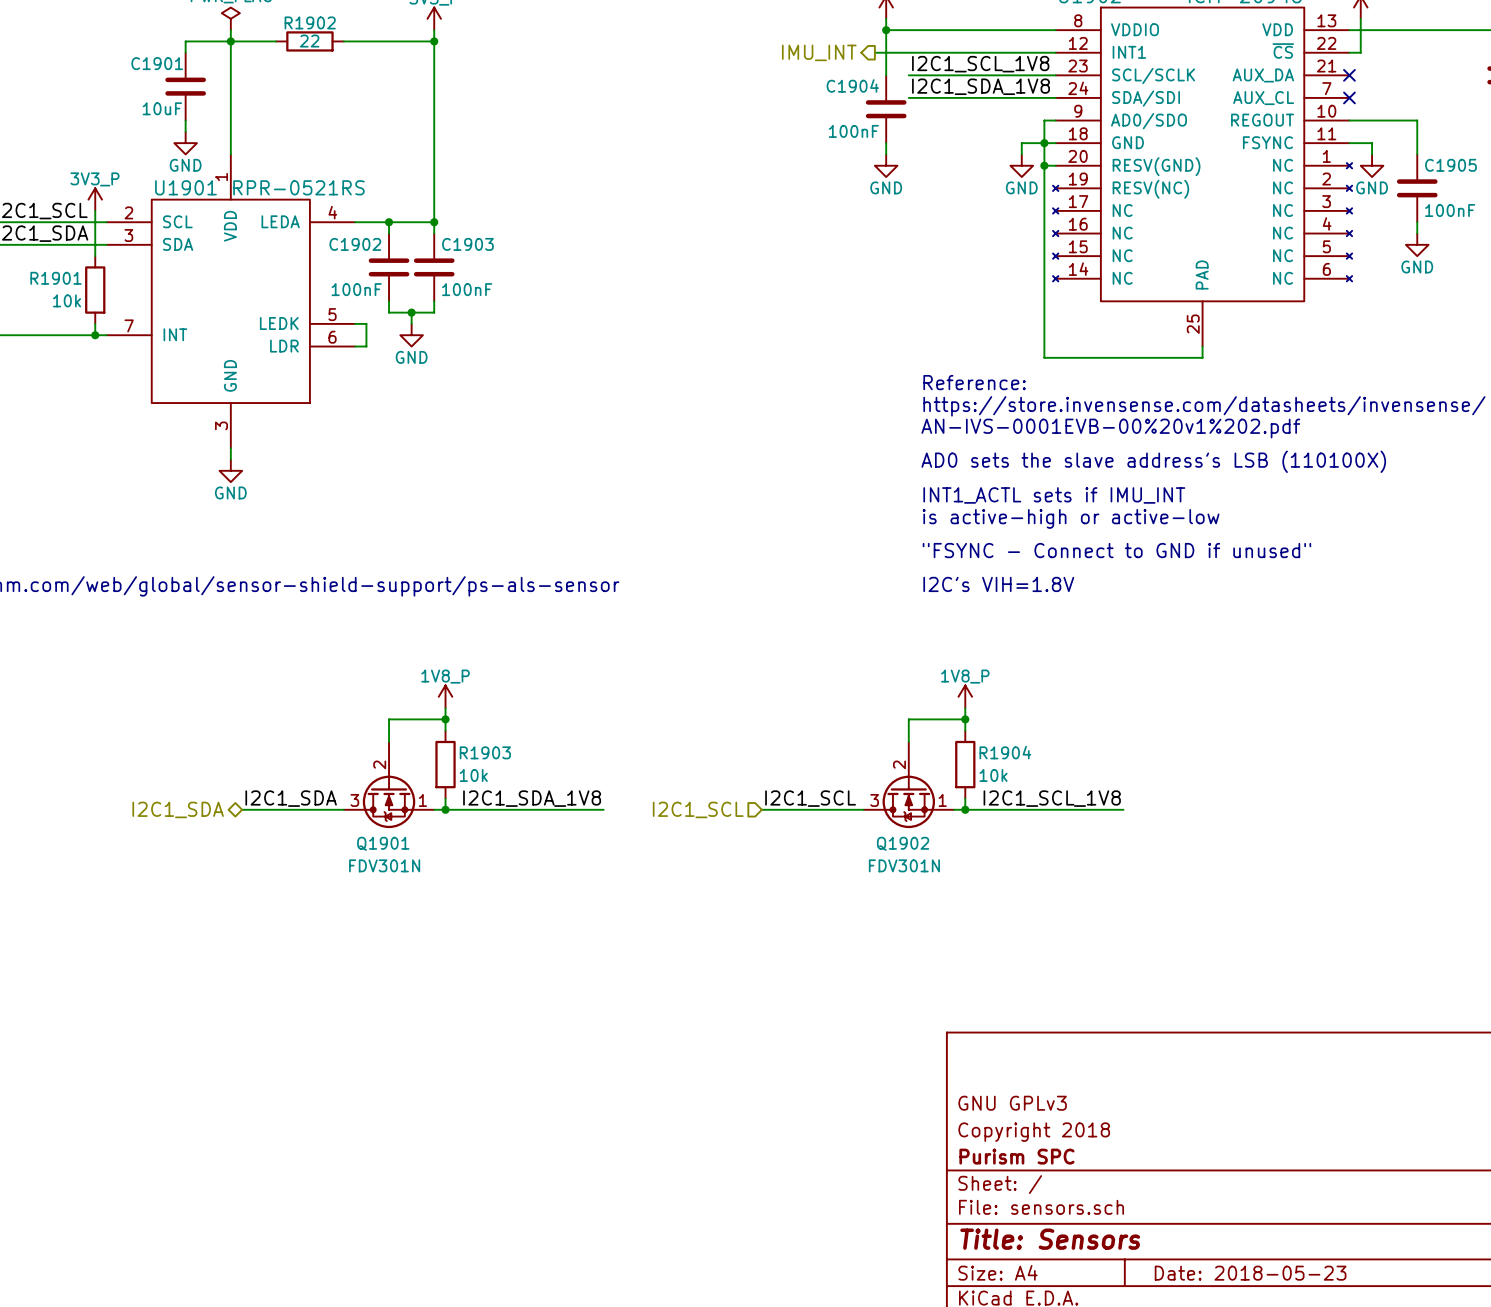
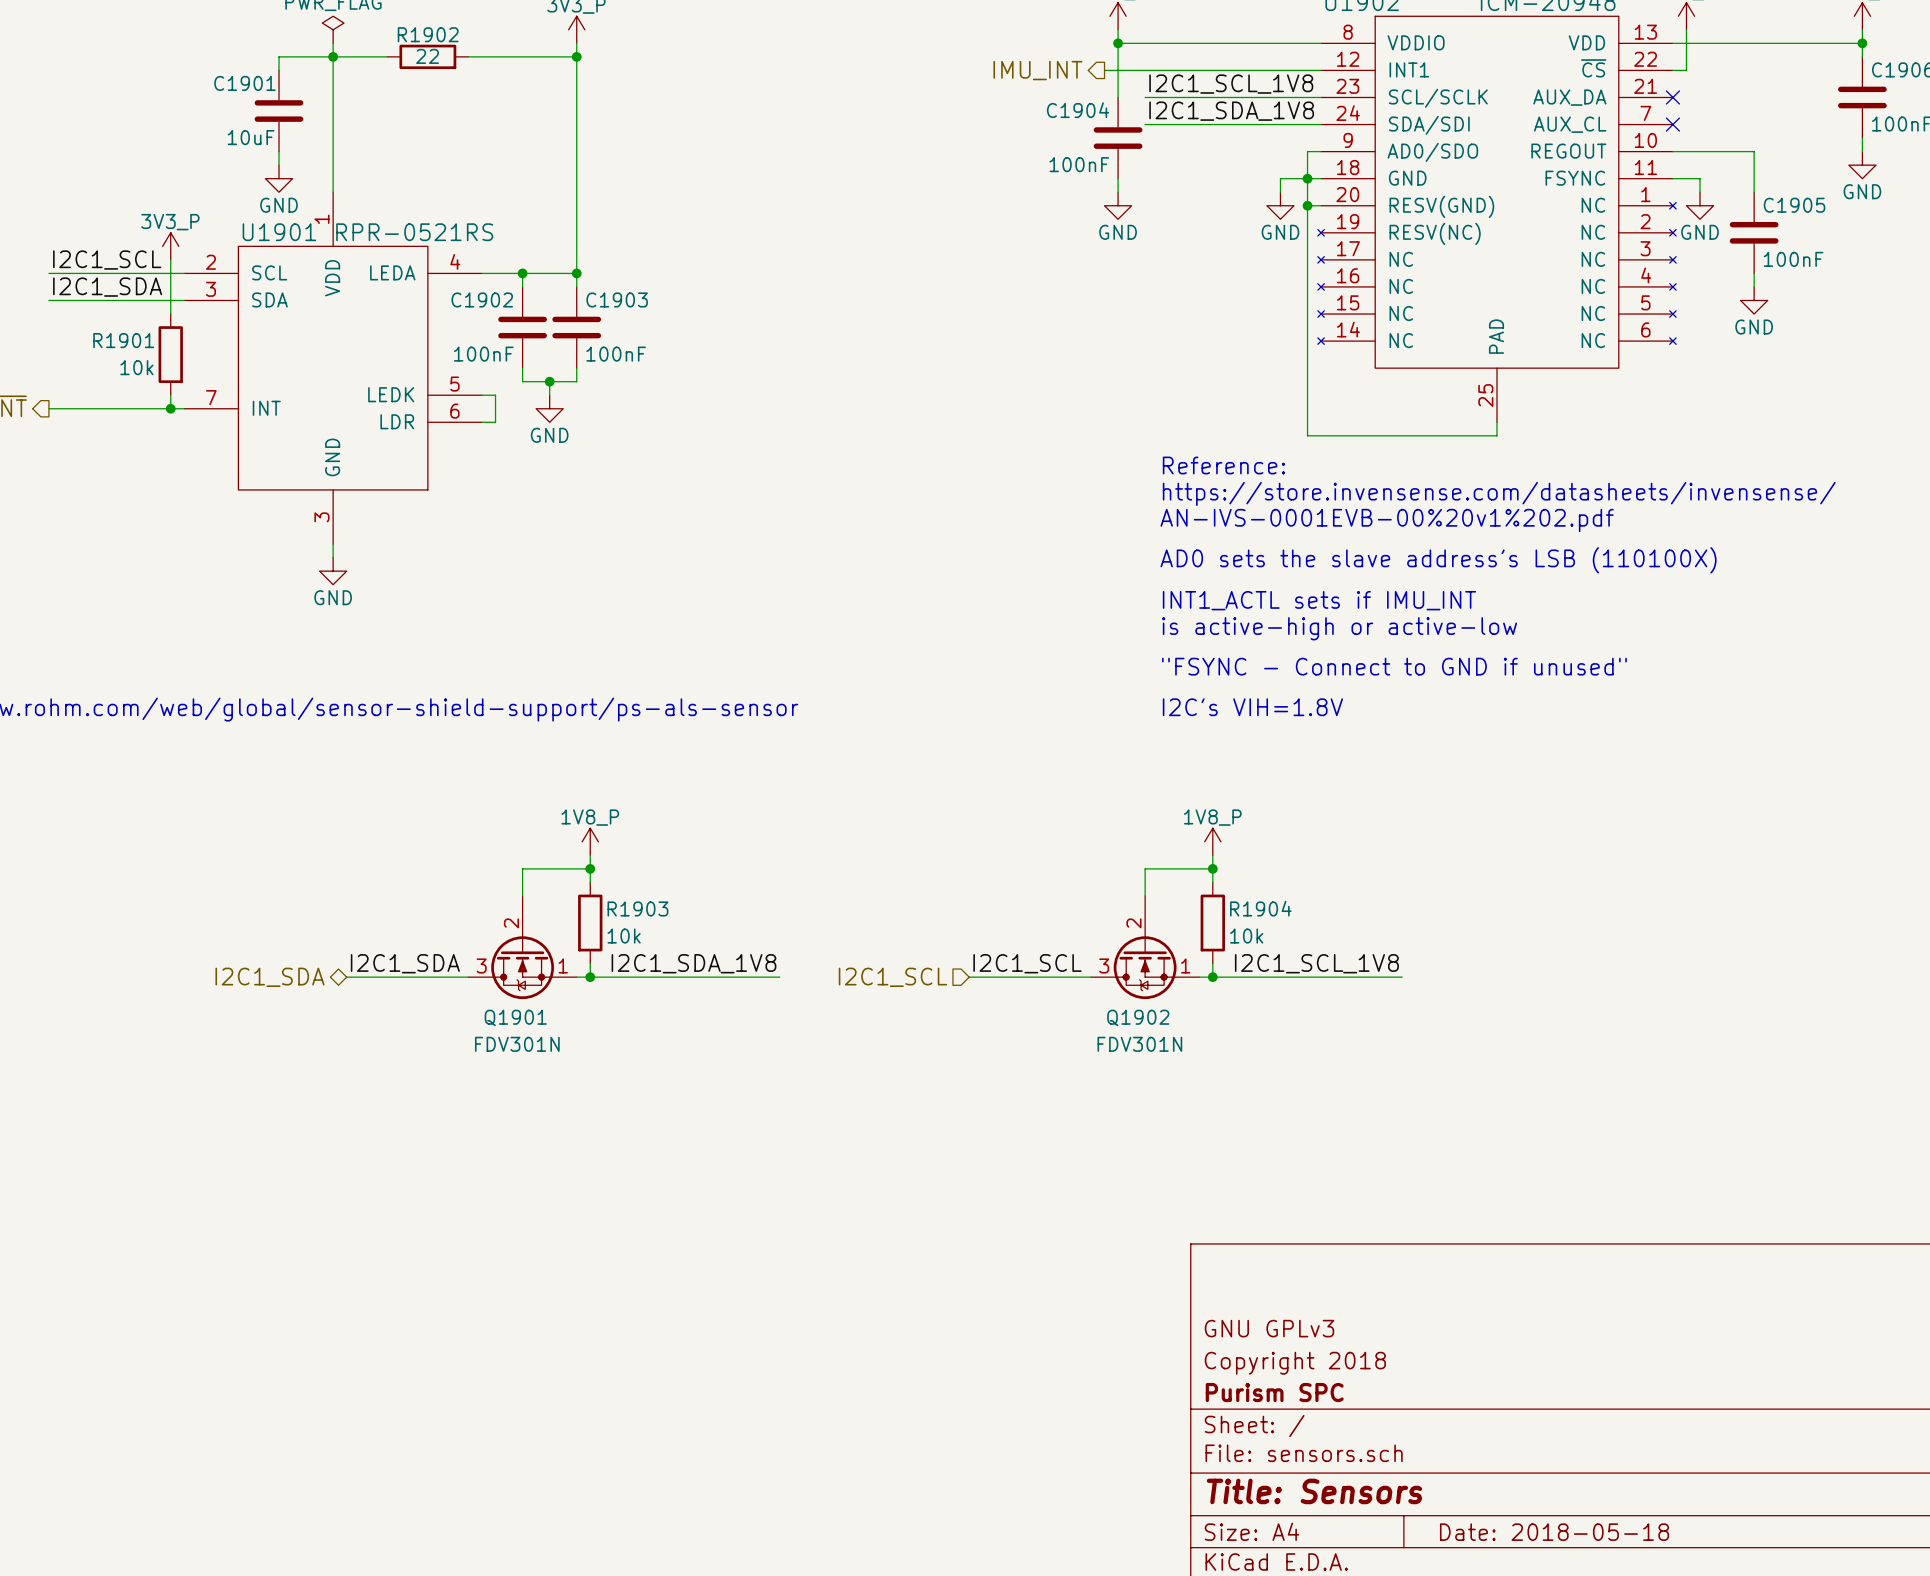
title block: Date: 2018-05-23 (1250, 1273) -> Date: 2018-05-18 (1554, 1532)

